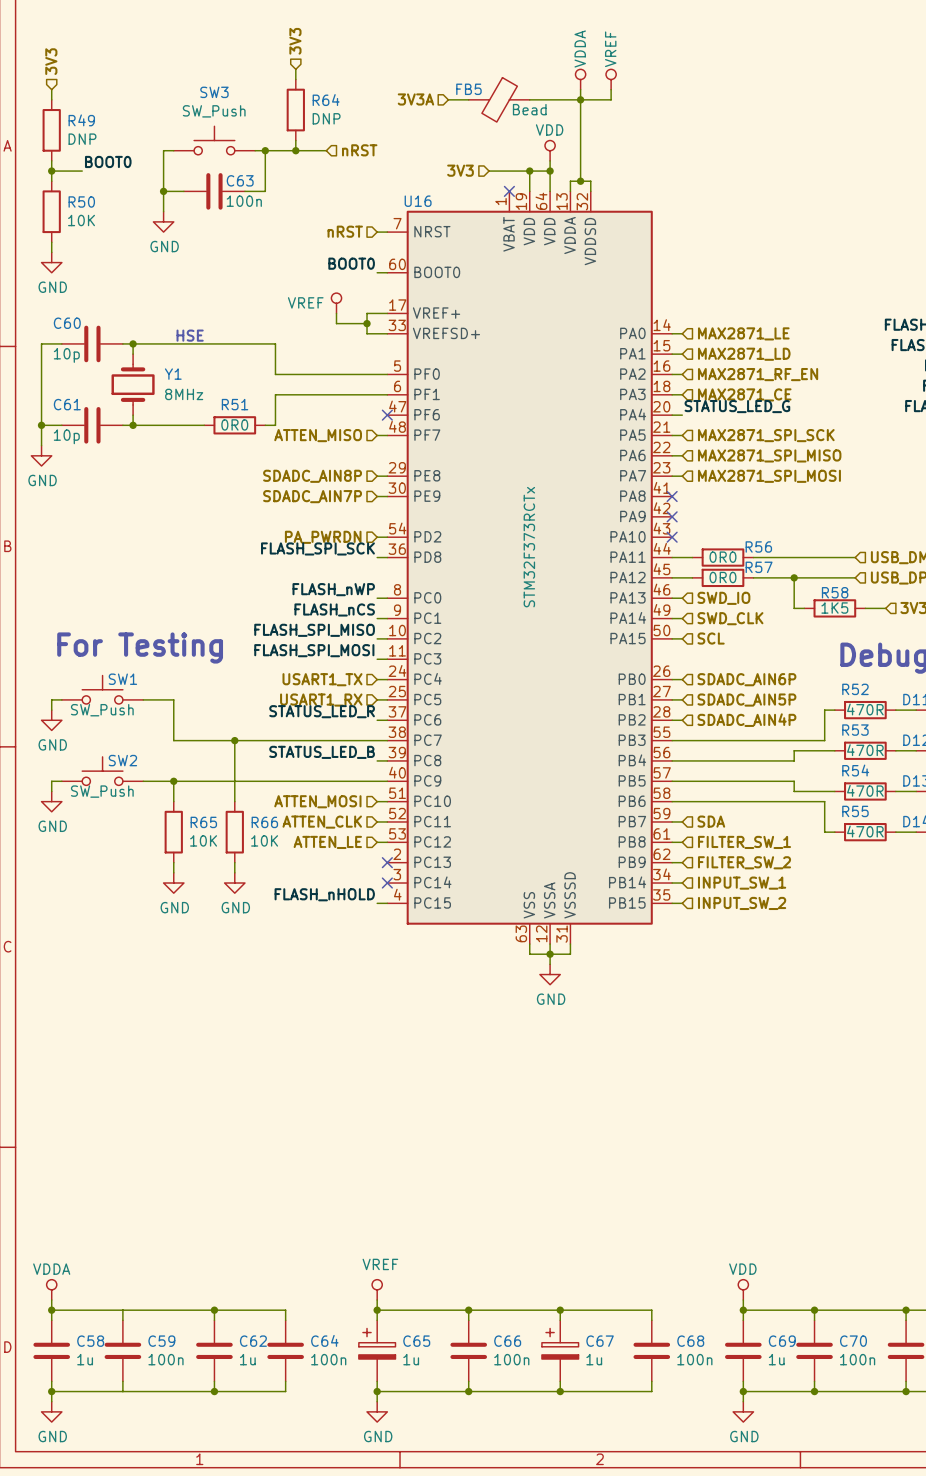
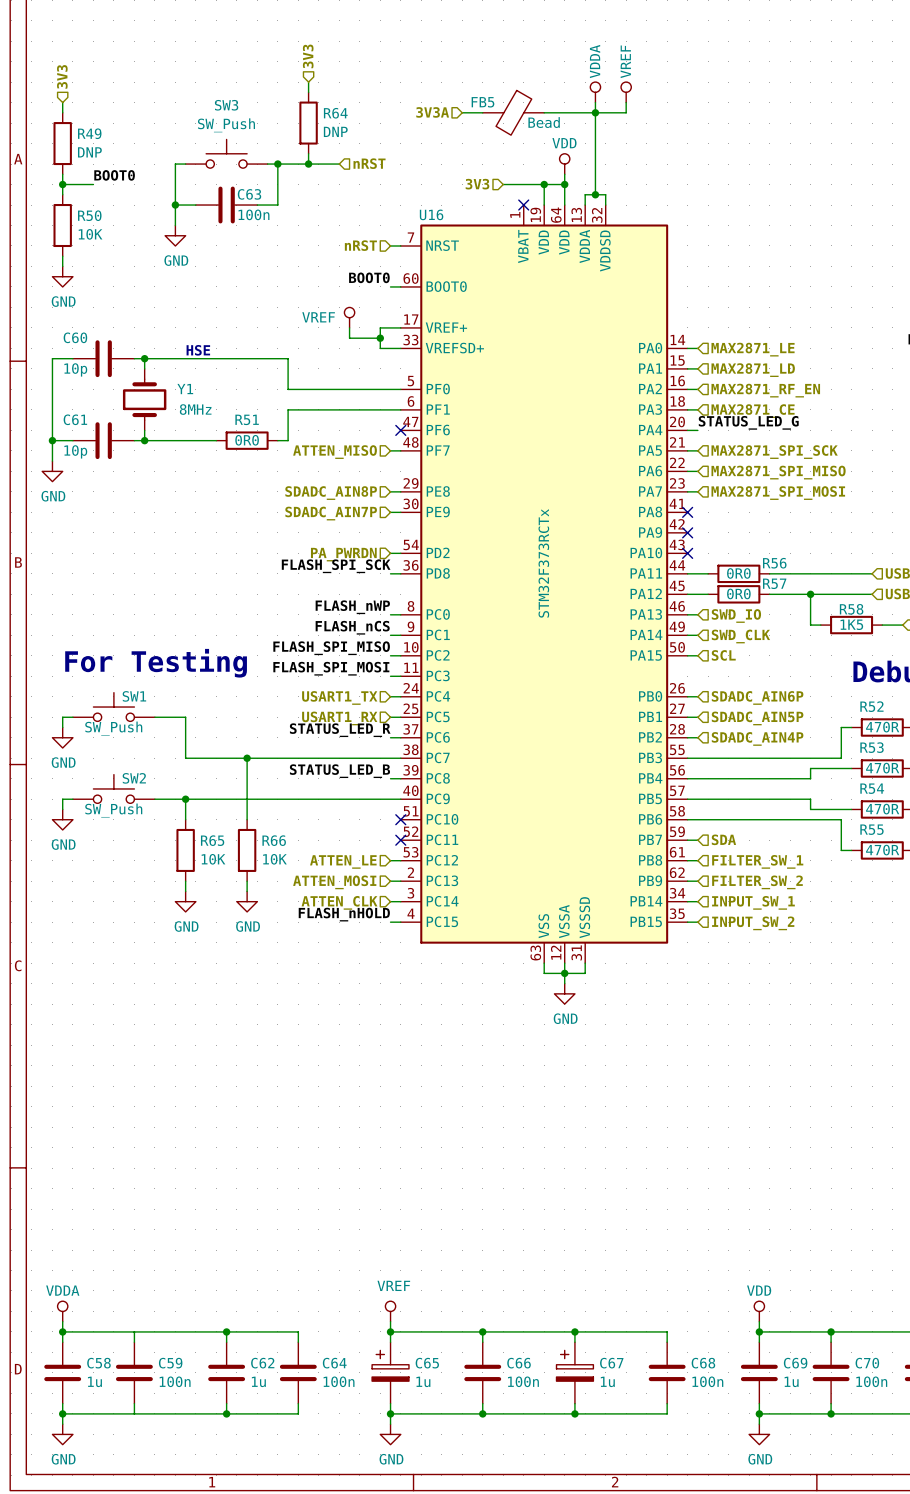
hierarchical label position: ATTEN_MOSI (317, 801) -> ATTEN_MOSI (334, 882)
wire: (377, 801) (387, 801) -> (390, 901) (400, 901)
no-connect mark: none -> (400, 819)
wire: (377, 821) (387, 821) -> (390, 881) (400, 881)
no-connect mark: none -> (400, 840)
hierarchical label position: ATTEN_CLK (322, 822) -> ATTEN_CLK (339, 902)
no-connect mark: (387, 862) -> none
no-connect mark: (387, 883) -> none

